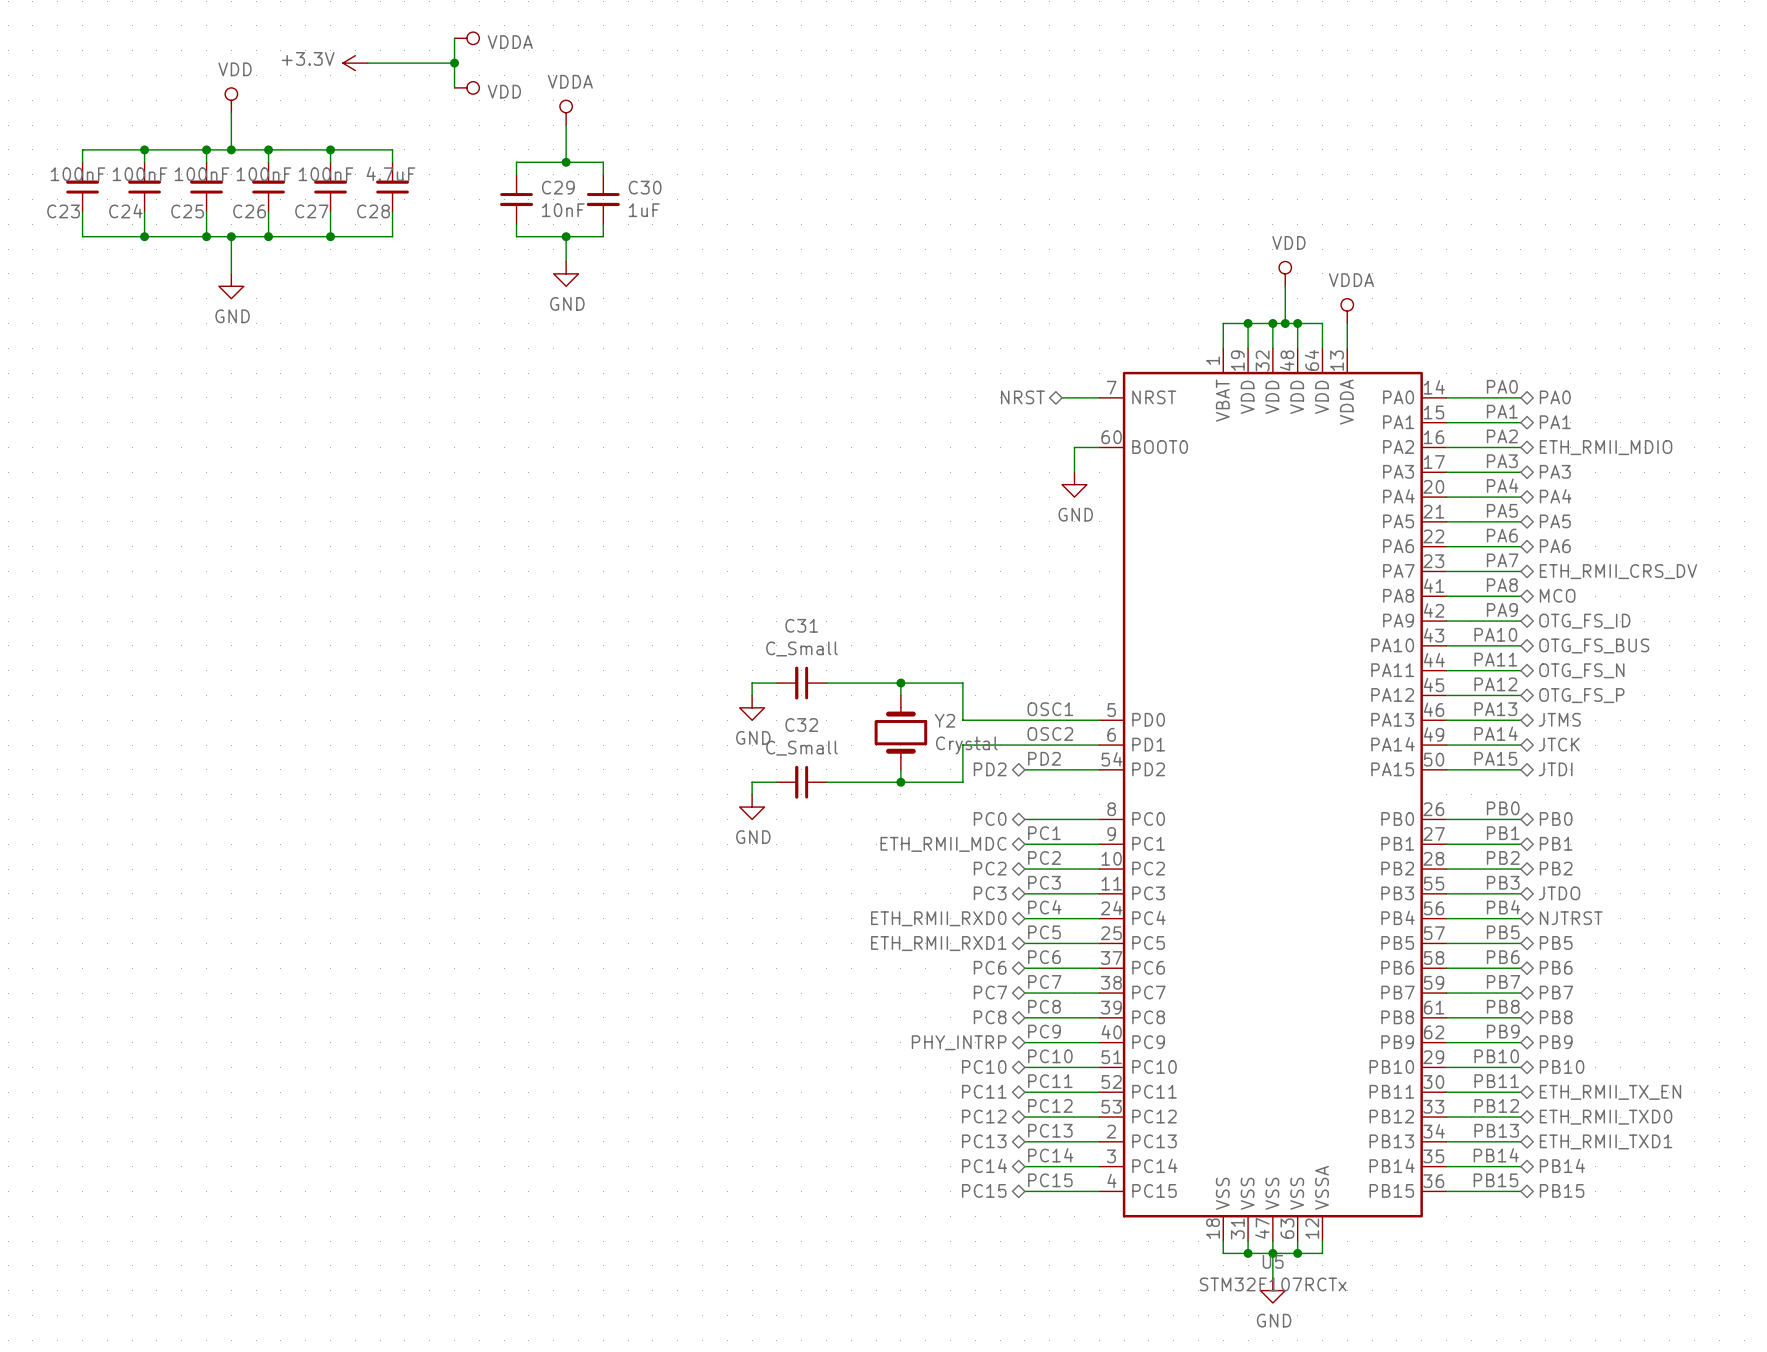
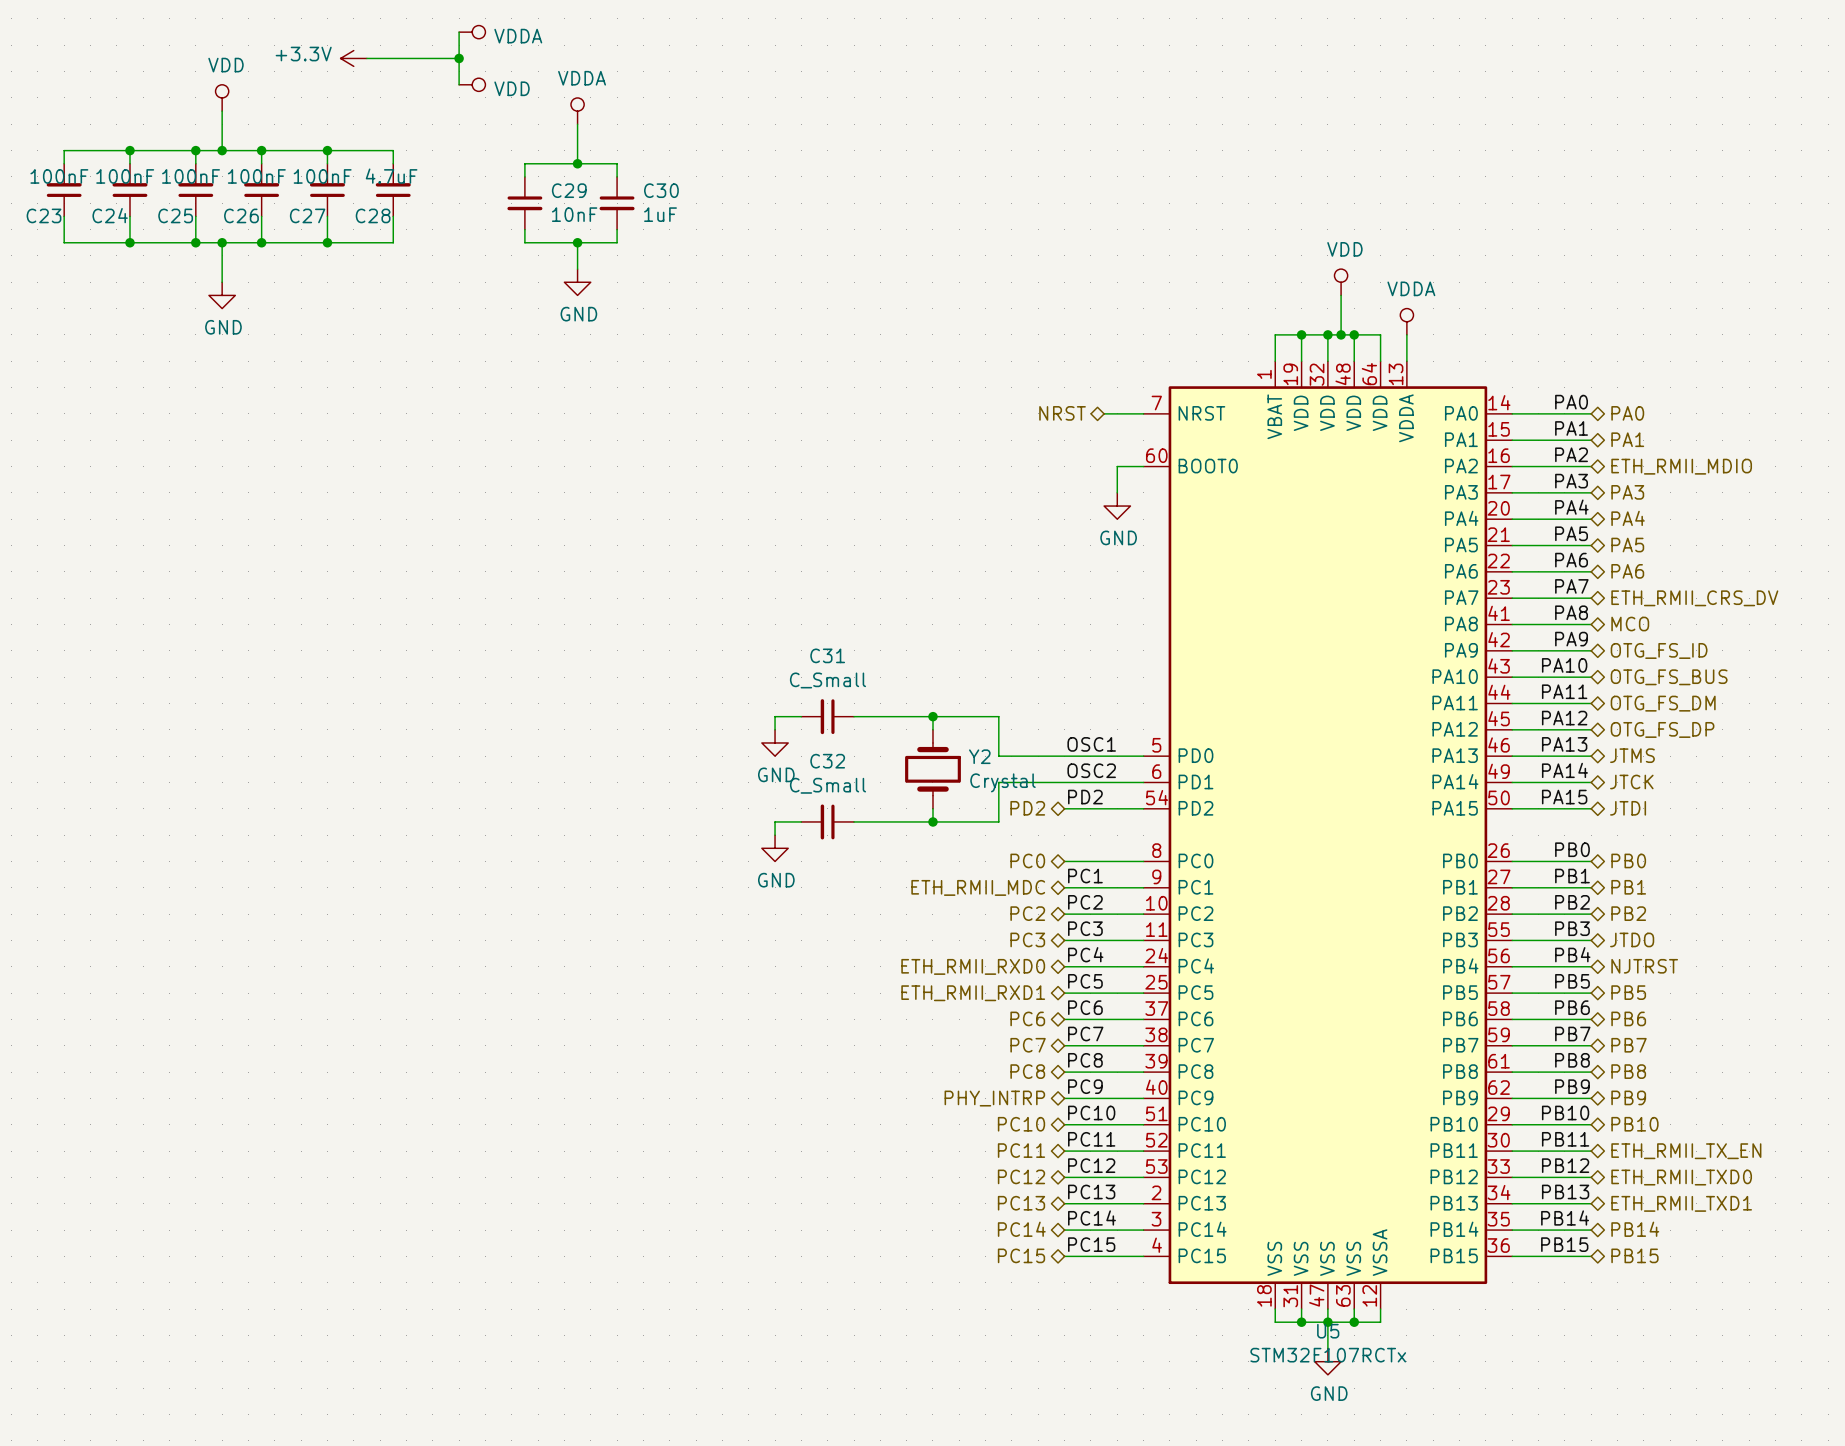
hierarchical label: OTG_FS_N (1581, 670) -> OTG_FS_DM (1663, 703)
hierarchical label: OTG_FS_P (1581, 695) -> OTG_FS_DP (1662, 729)

